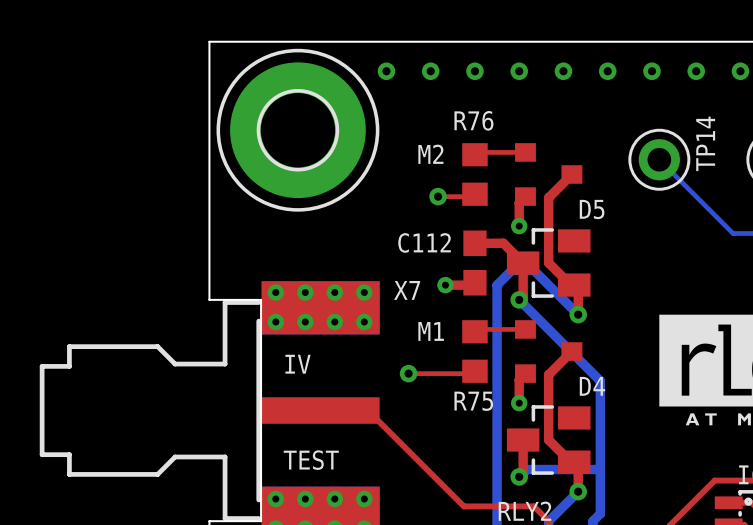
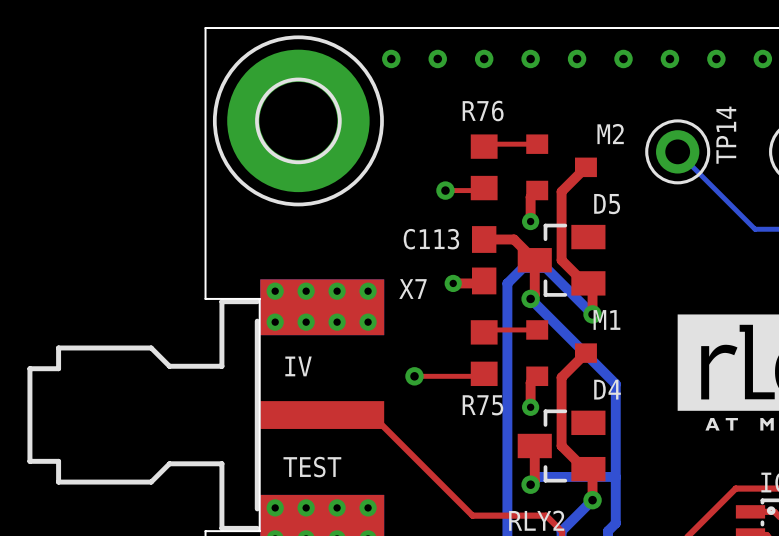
M2 name position: M2 (430, 154) -> M2 (610, 134)
C112 name: C112 (424, 242) -> C113 (431, 239)
M1 name position: M1 (431, 331) -> M1 (606, 319)

